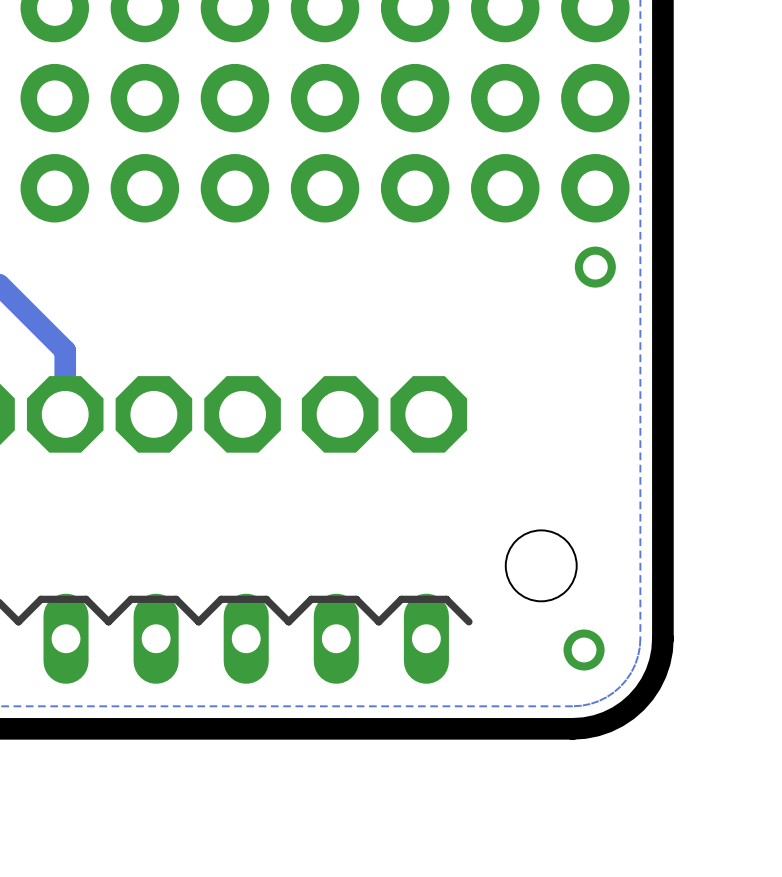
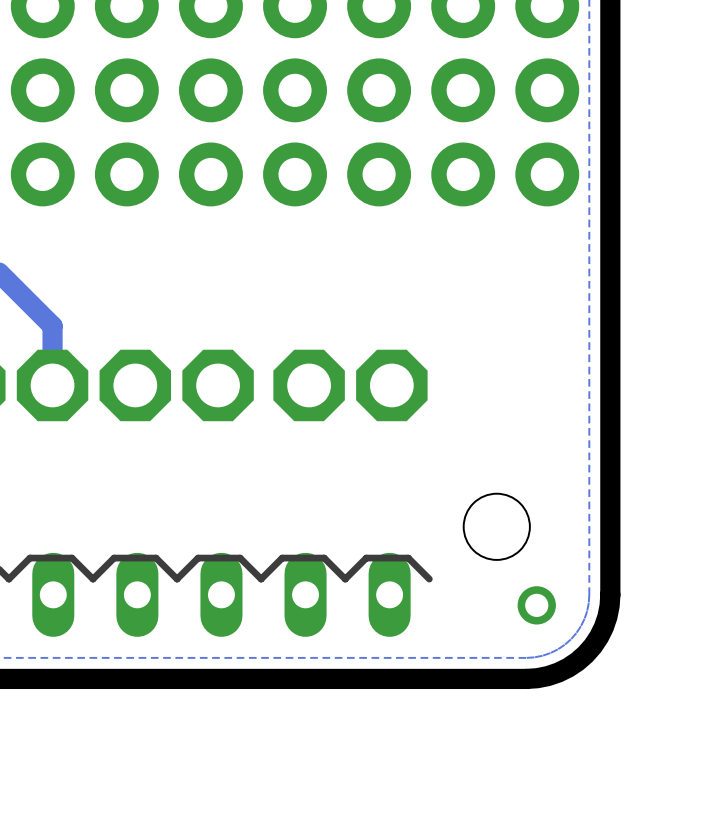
via: (595, 267) -> none

